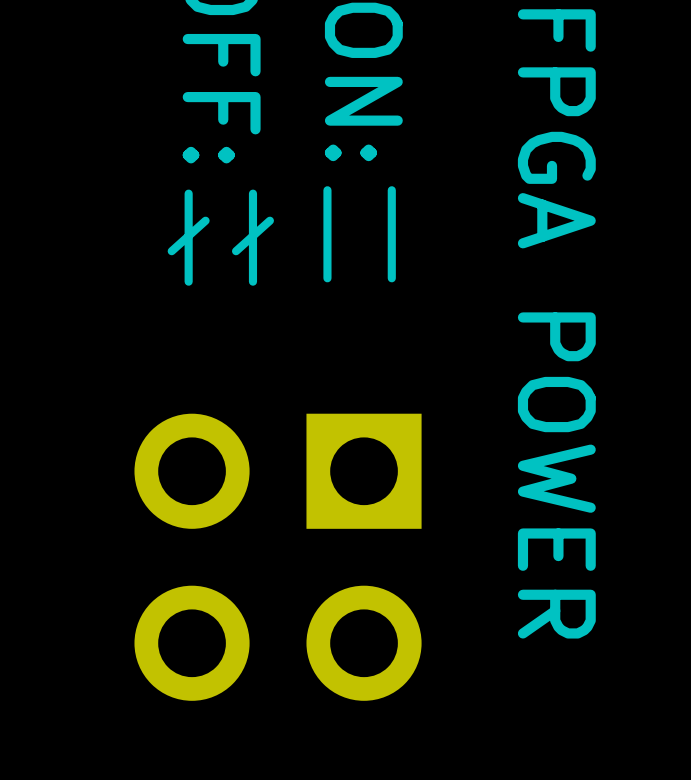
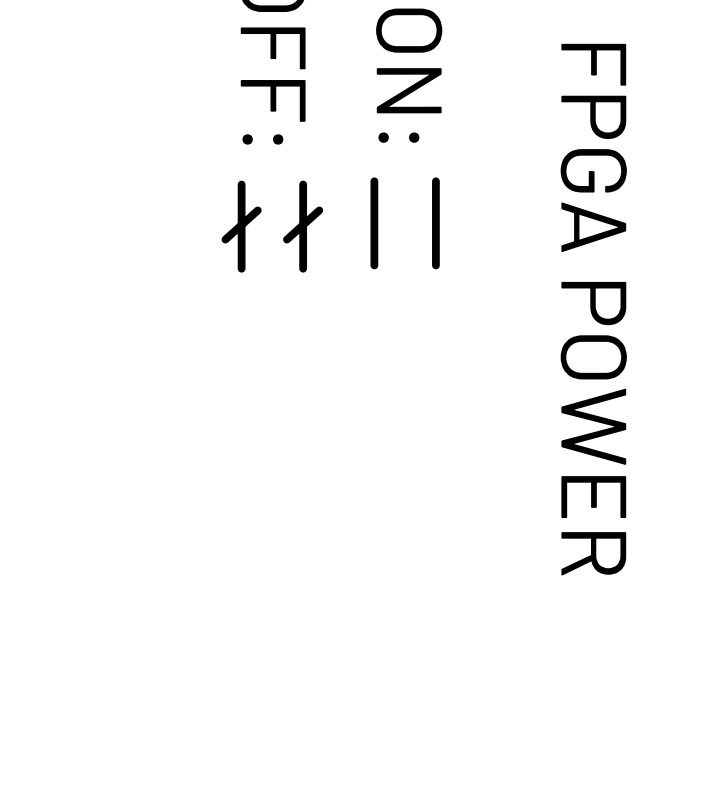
part: (278, 557) -> none

